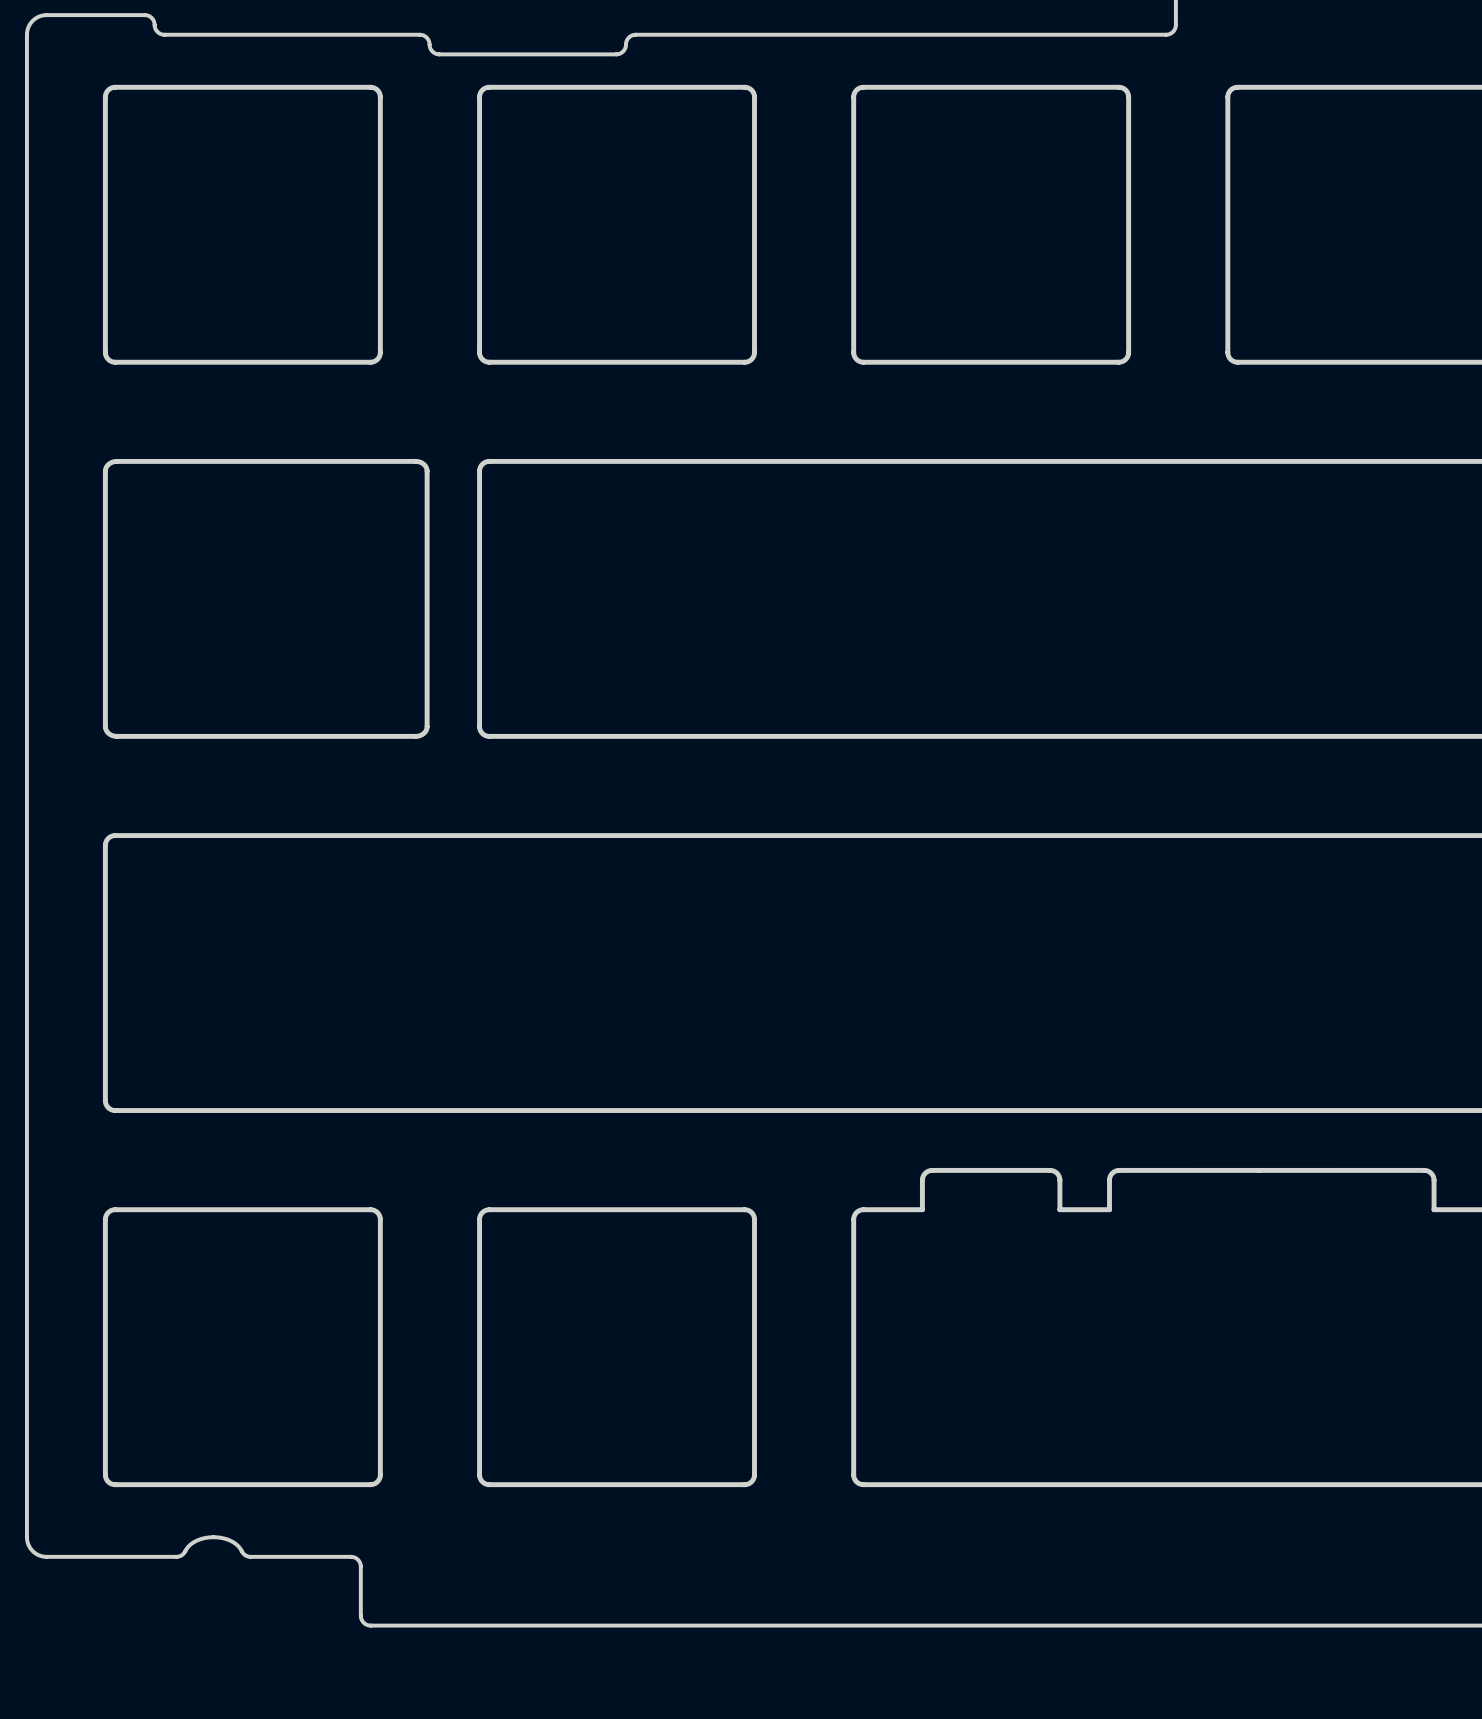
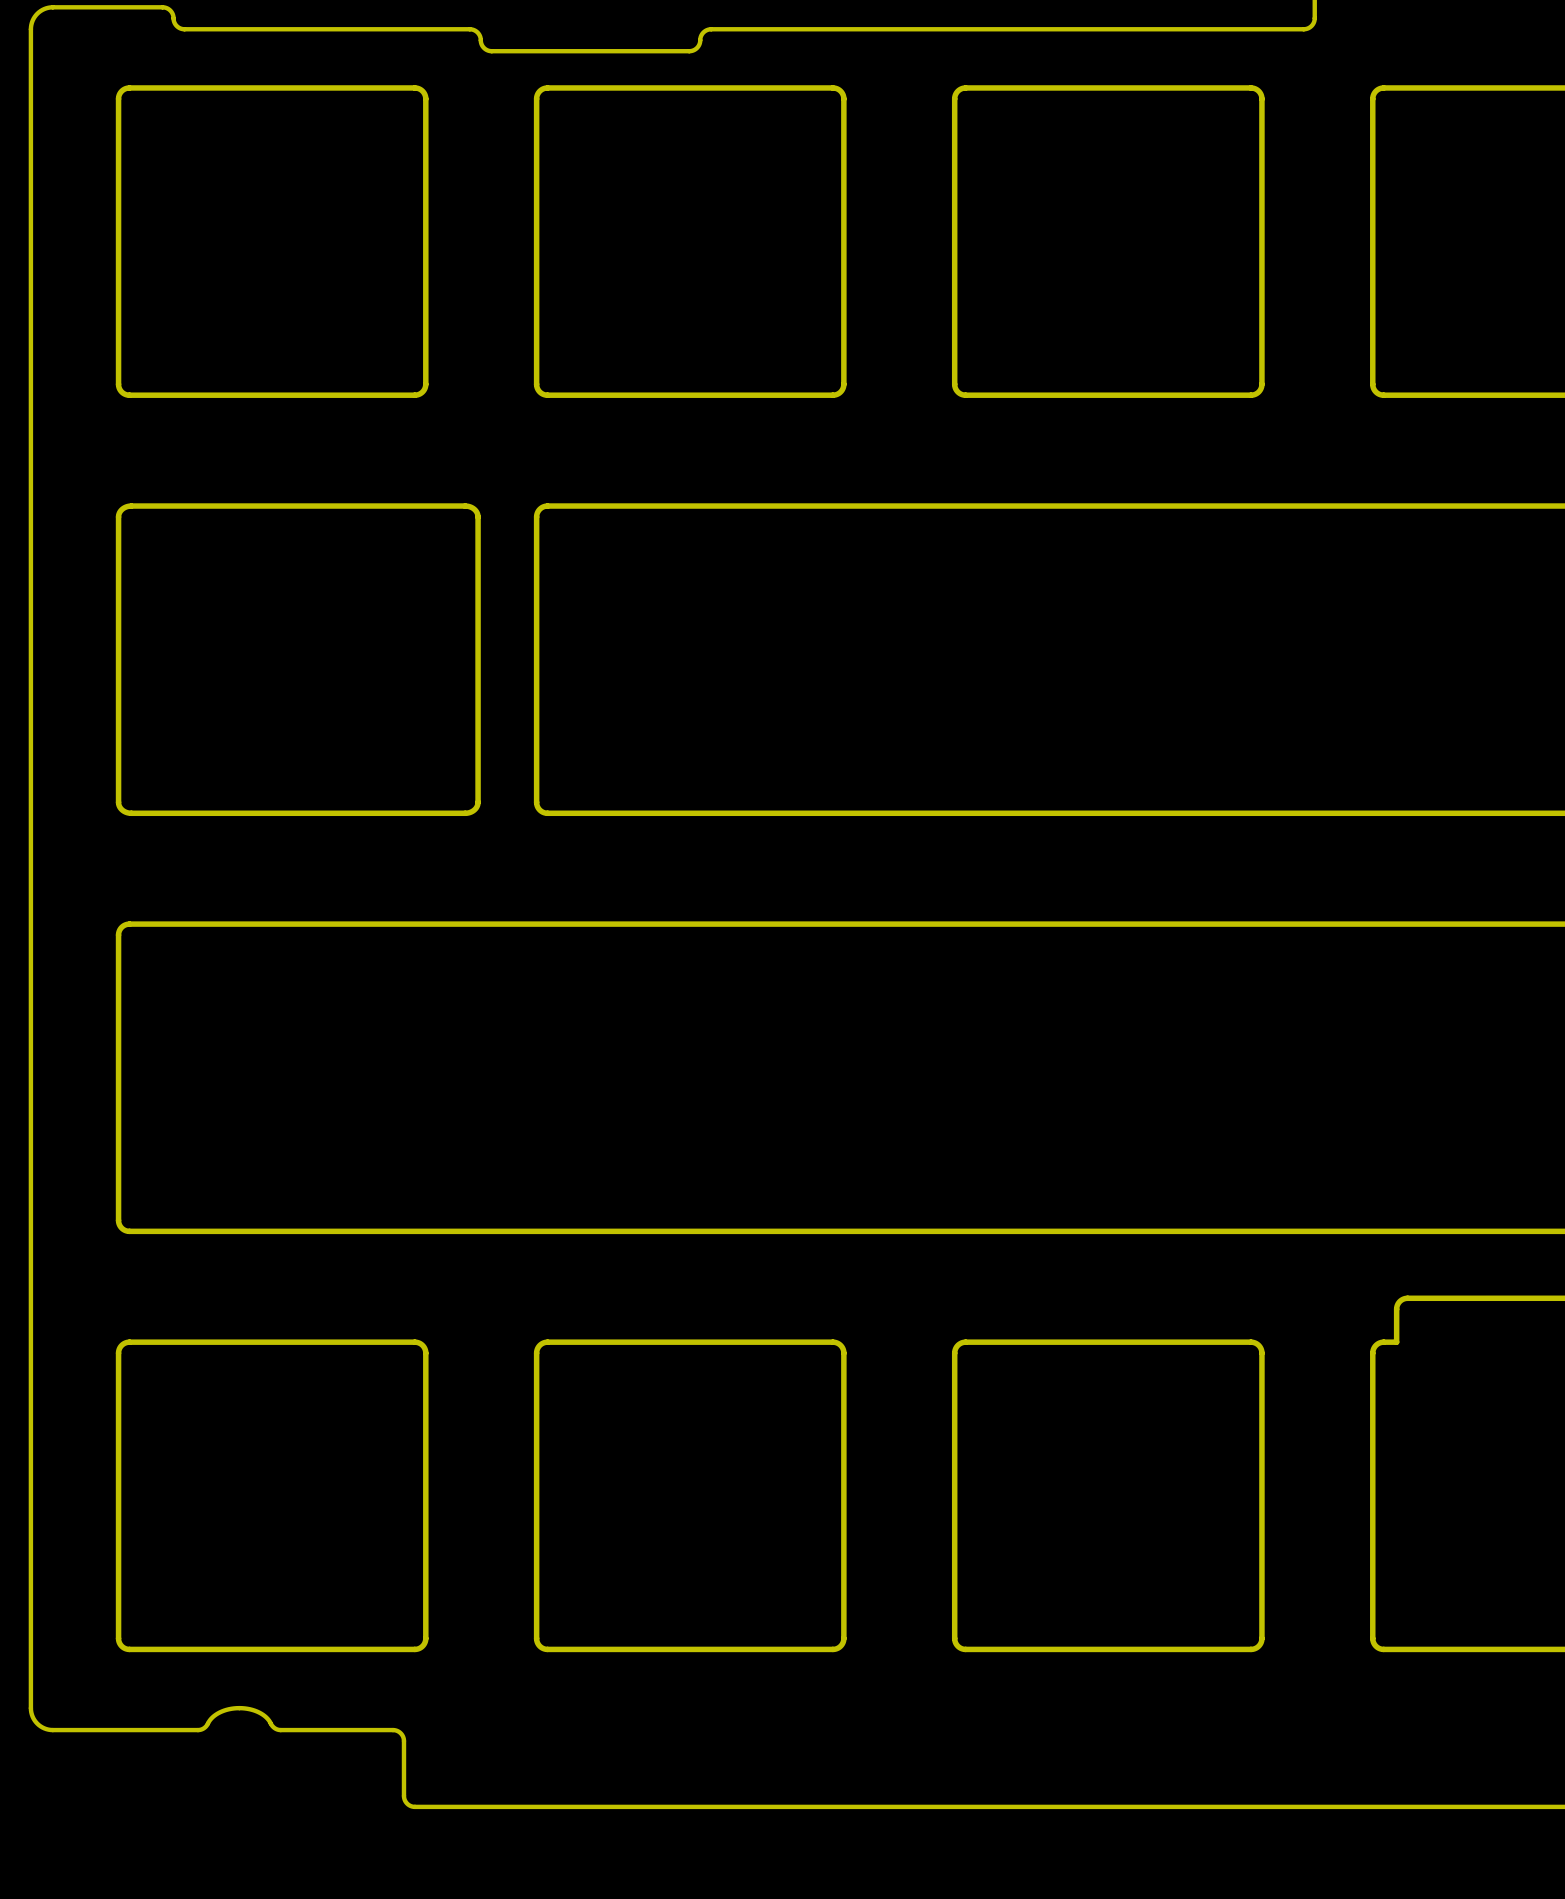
board edge: (1258, 1170) (1116, 1170) (1109, 1178) (1109, 1209) -> (1407, 1298) (1400, 1300) (1396, 1307) (1396, 1342) (1379, 1343) (1374, 1347) (1372, 1352) (1372, 1638) (1375, 1646) (1383, 1649)
board edge: (863, 1209) (922, 1209) (922, 1178) (926, 1172) (932, 1170) (1053, 1170) (1059, 1178) (1059, 1209) -> (965, 1342) (1185, 1342)
board edge: (1118, 1484) (1237, 1484) -> (1250, 1649) (1258, 1646) (1261, 1638) (1261, 1353) (1260, 1347) (1256, 1343) (1240, 1342)

